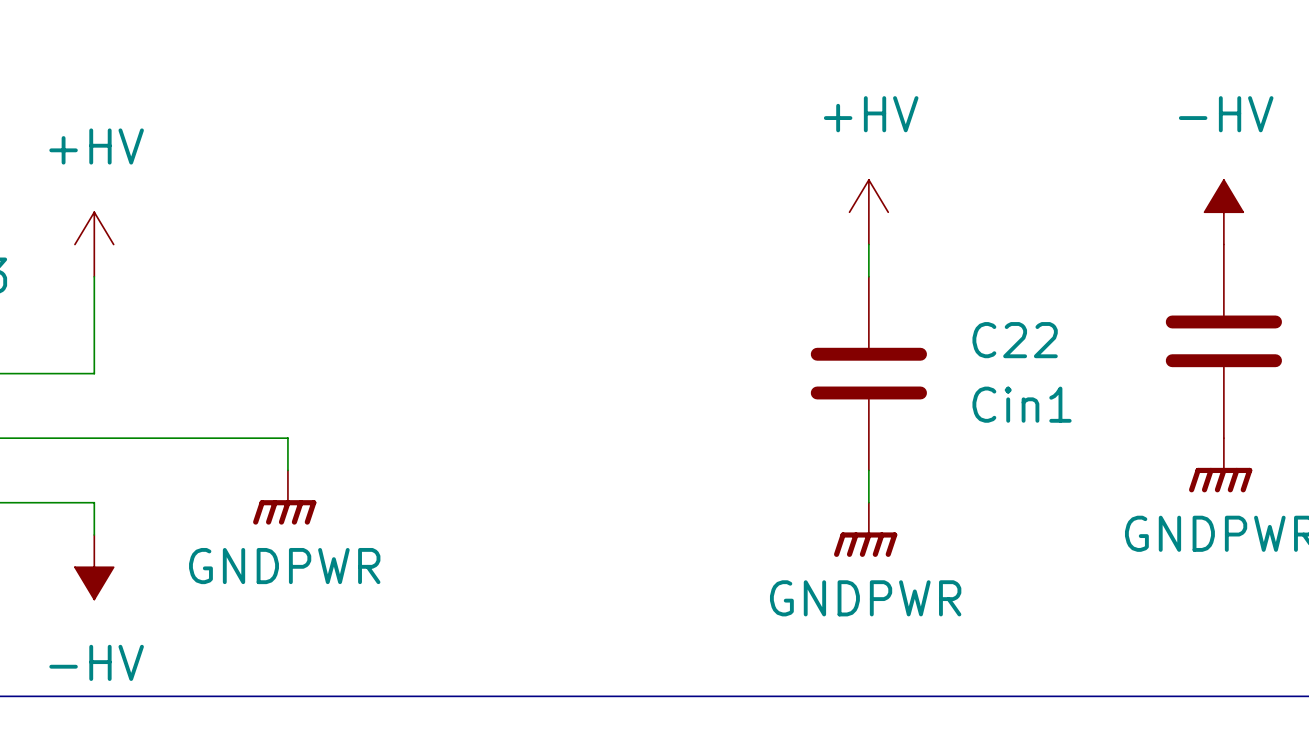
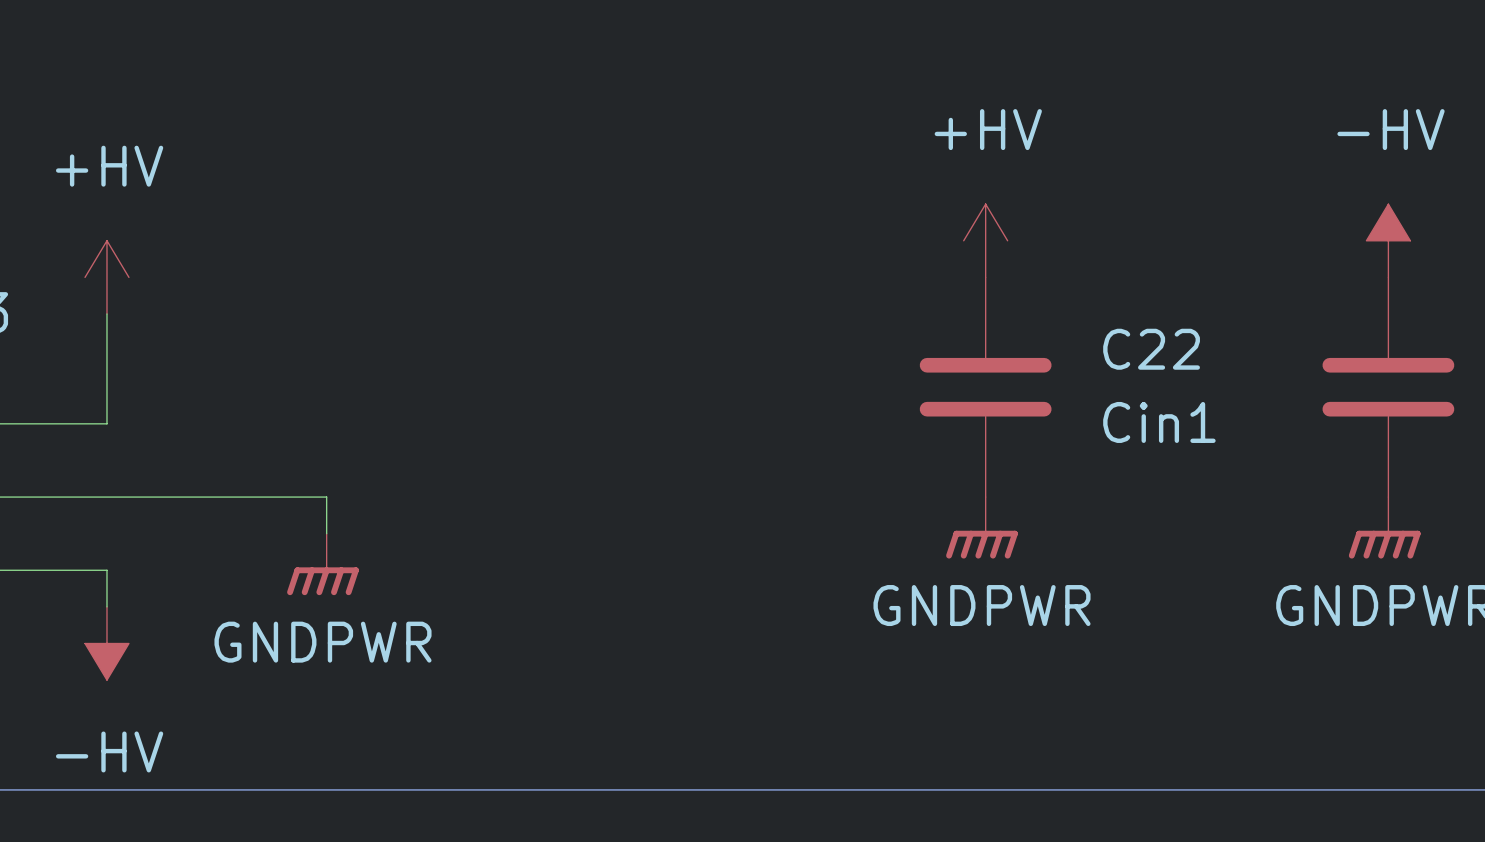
C22 position: (868, 373) -> (985, 387)
wire: (868, 470) (868, 502) -> none
power symbol position: GNDPWR (865, 529) -> GNDPWR (982, 527)

